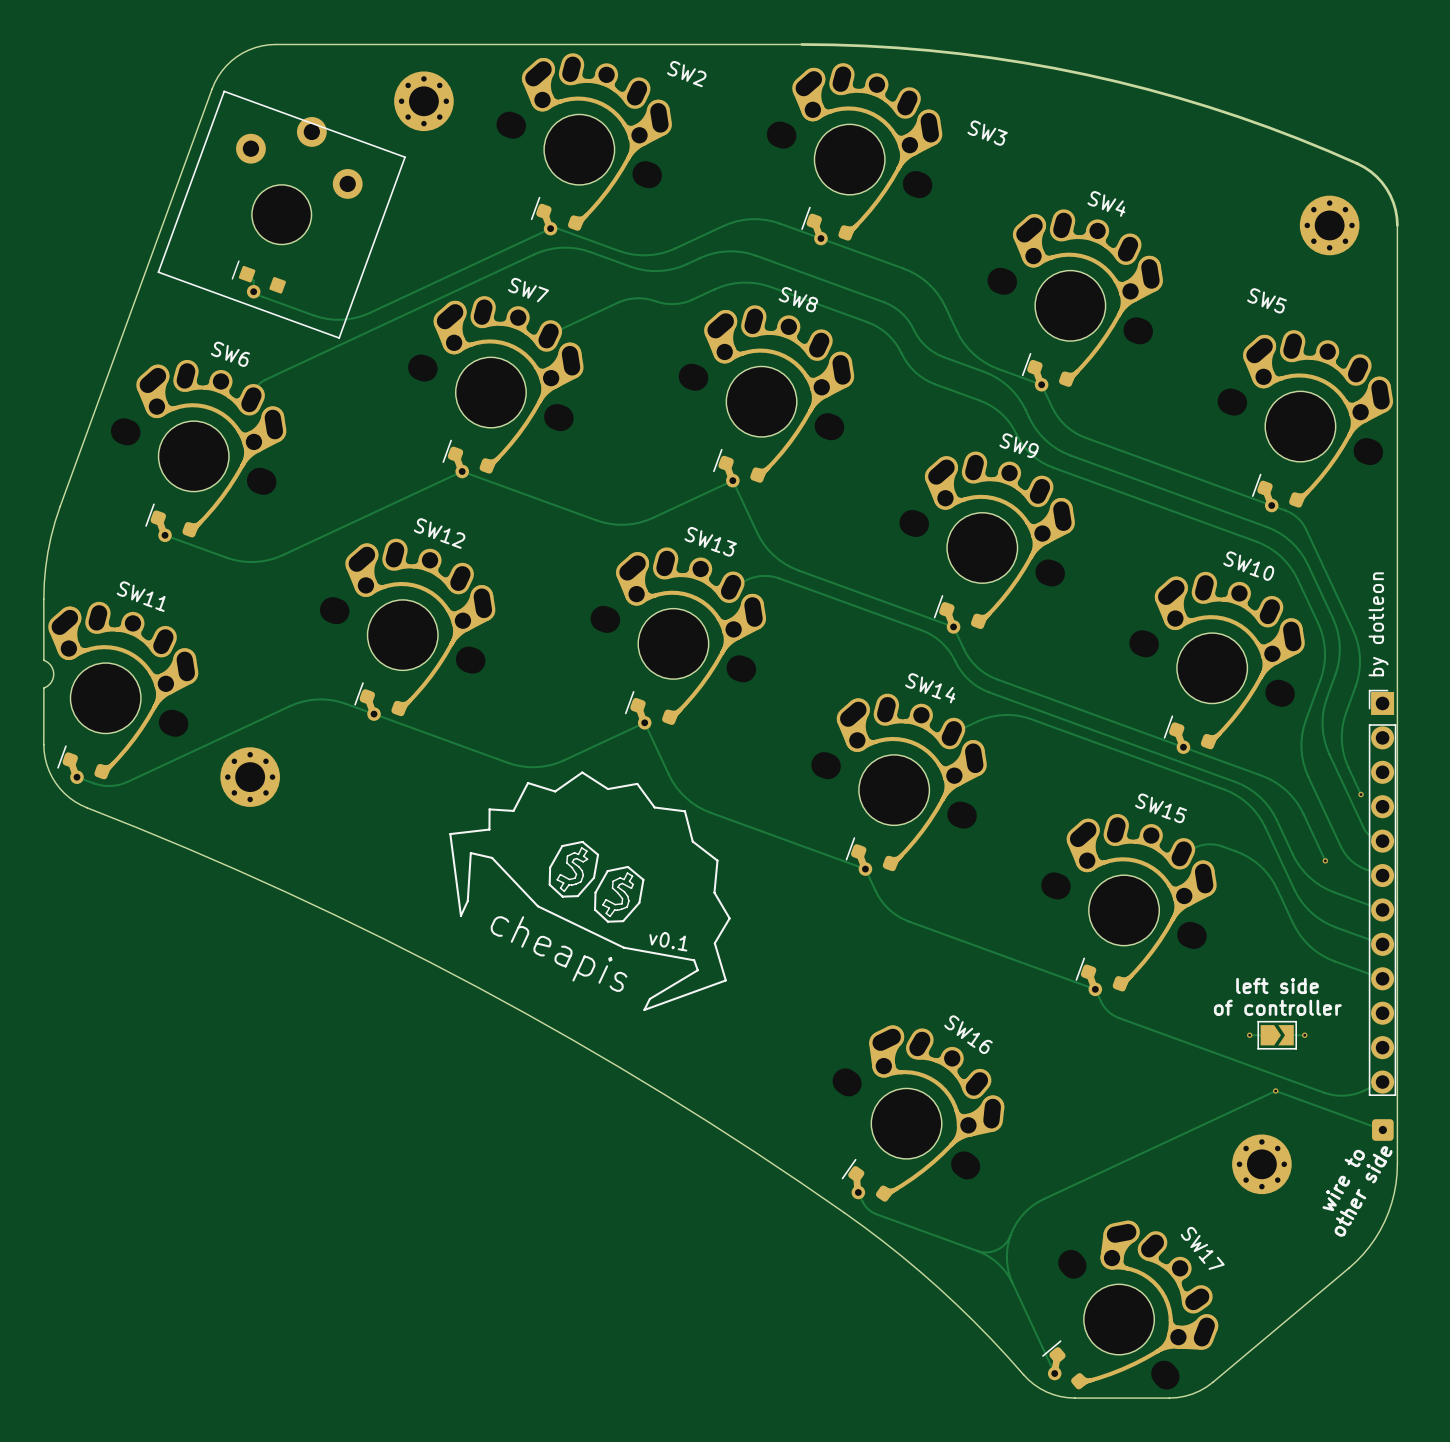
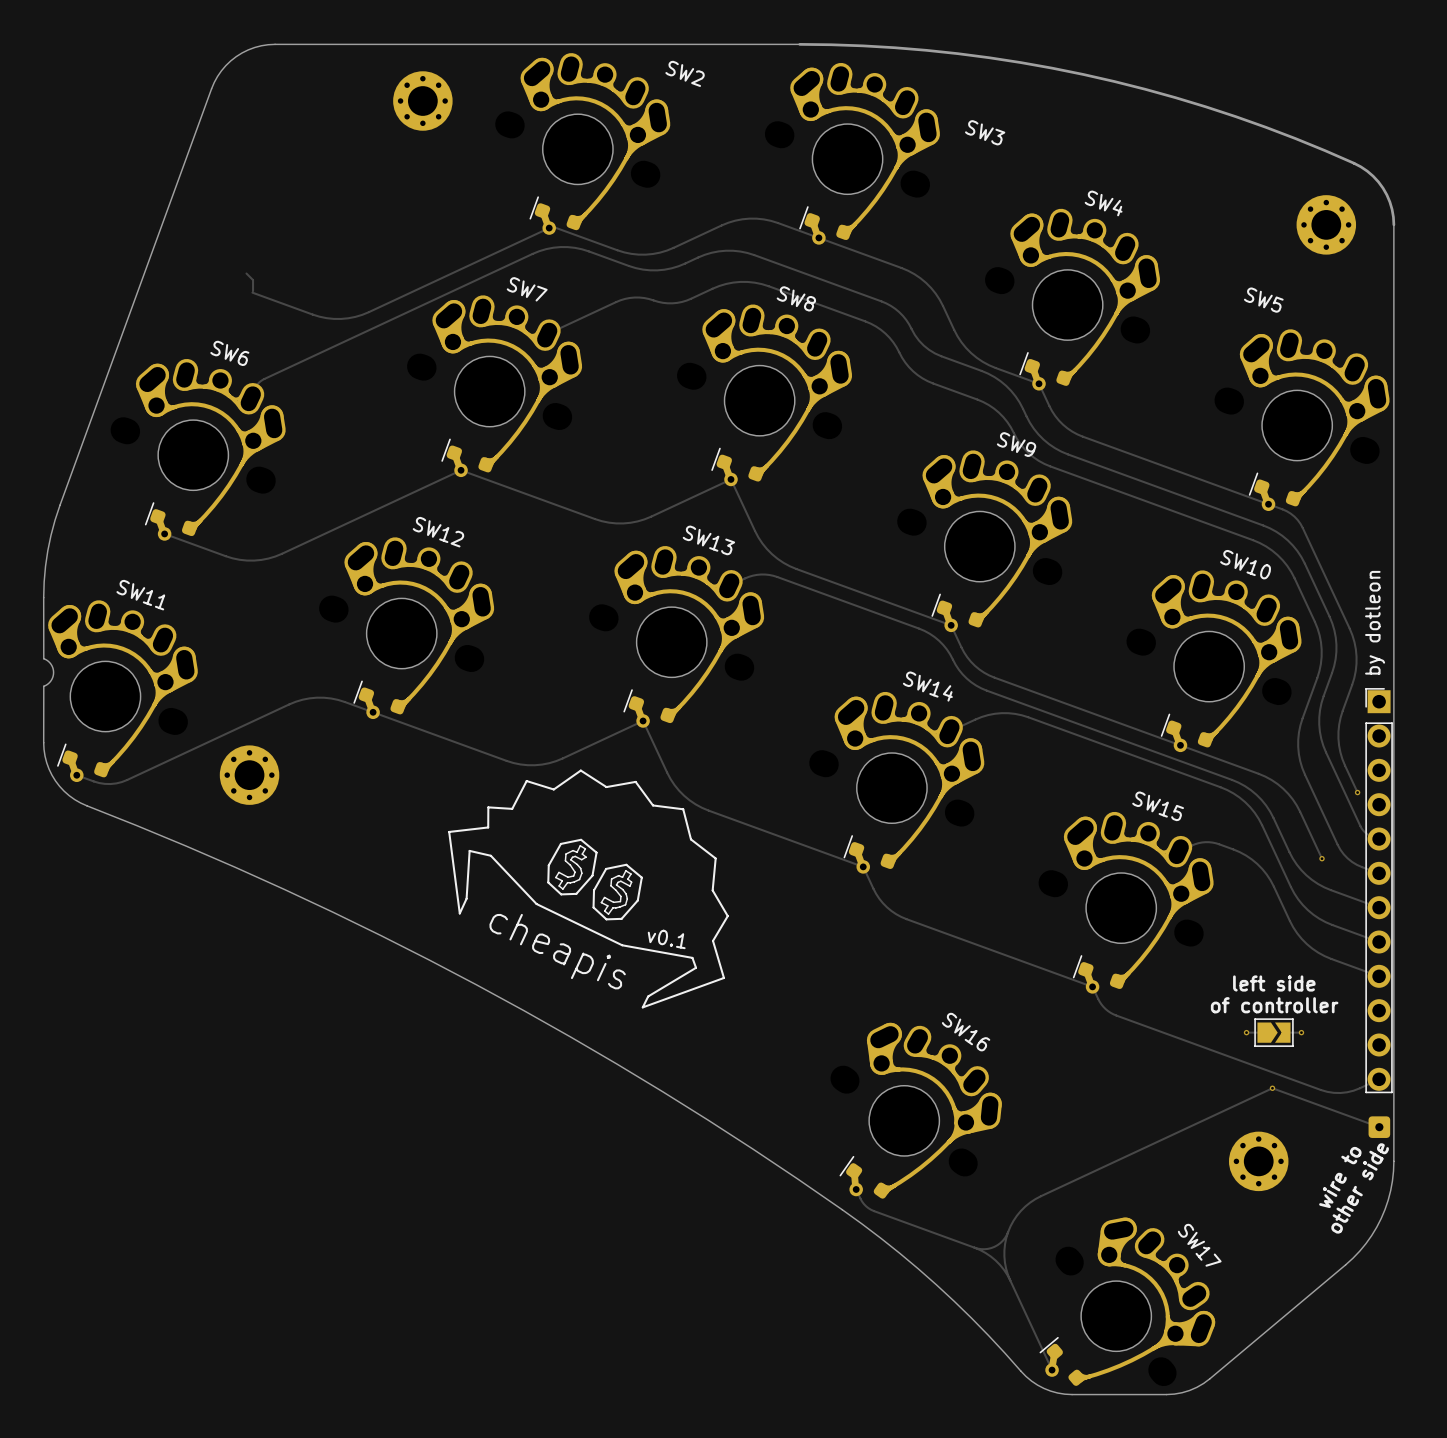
part: (281, 214) -> none

